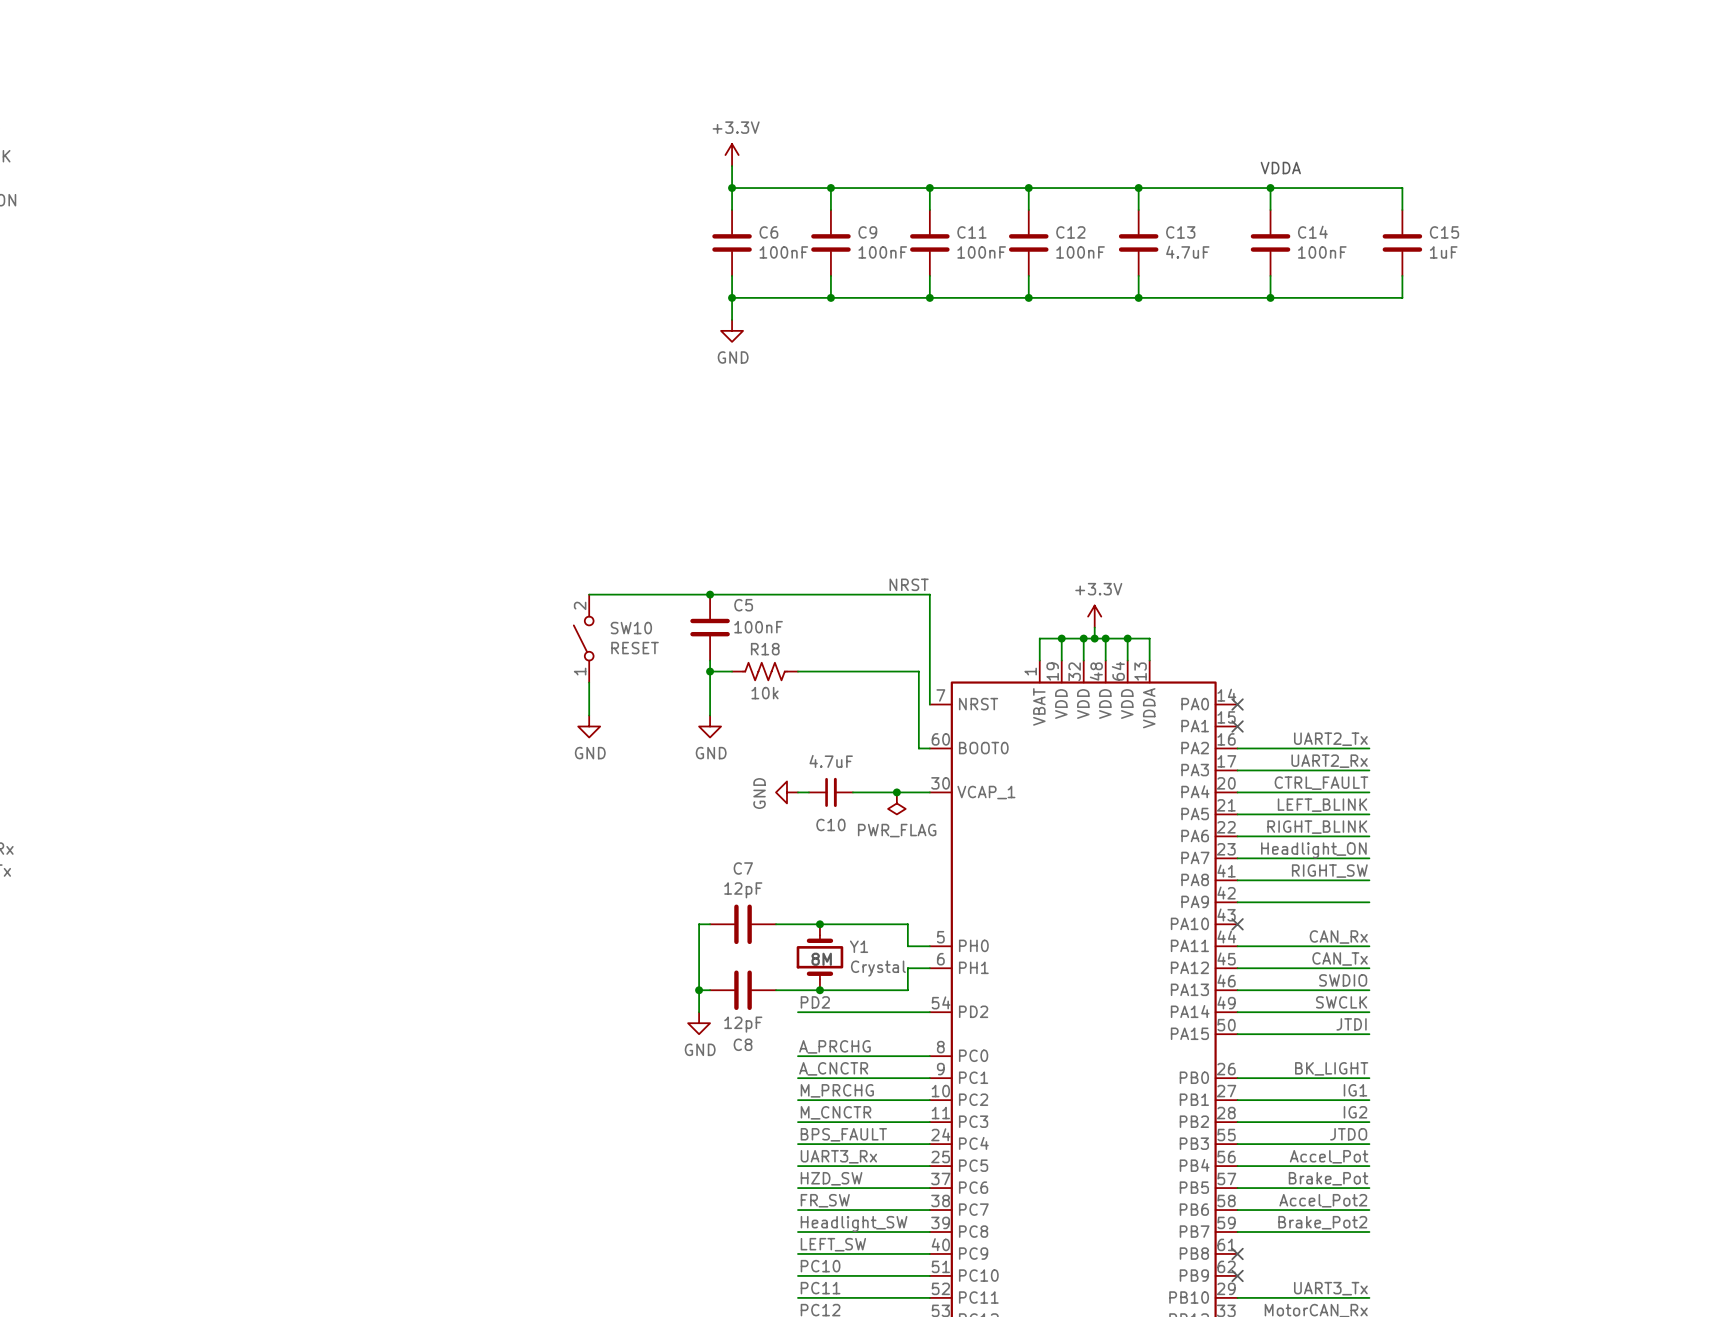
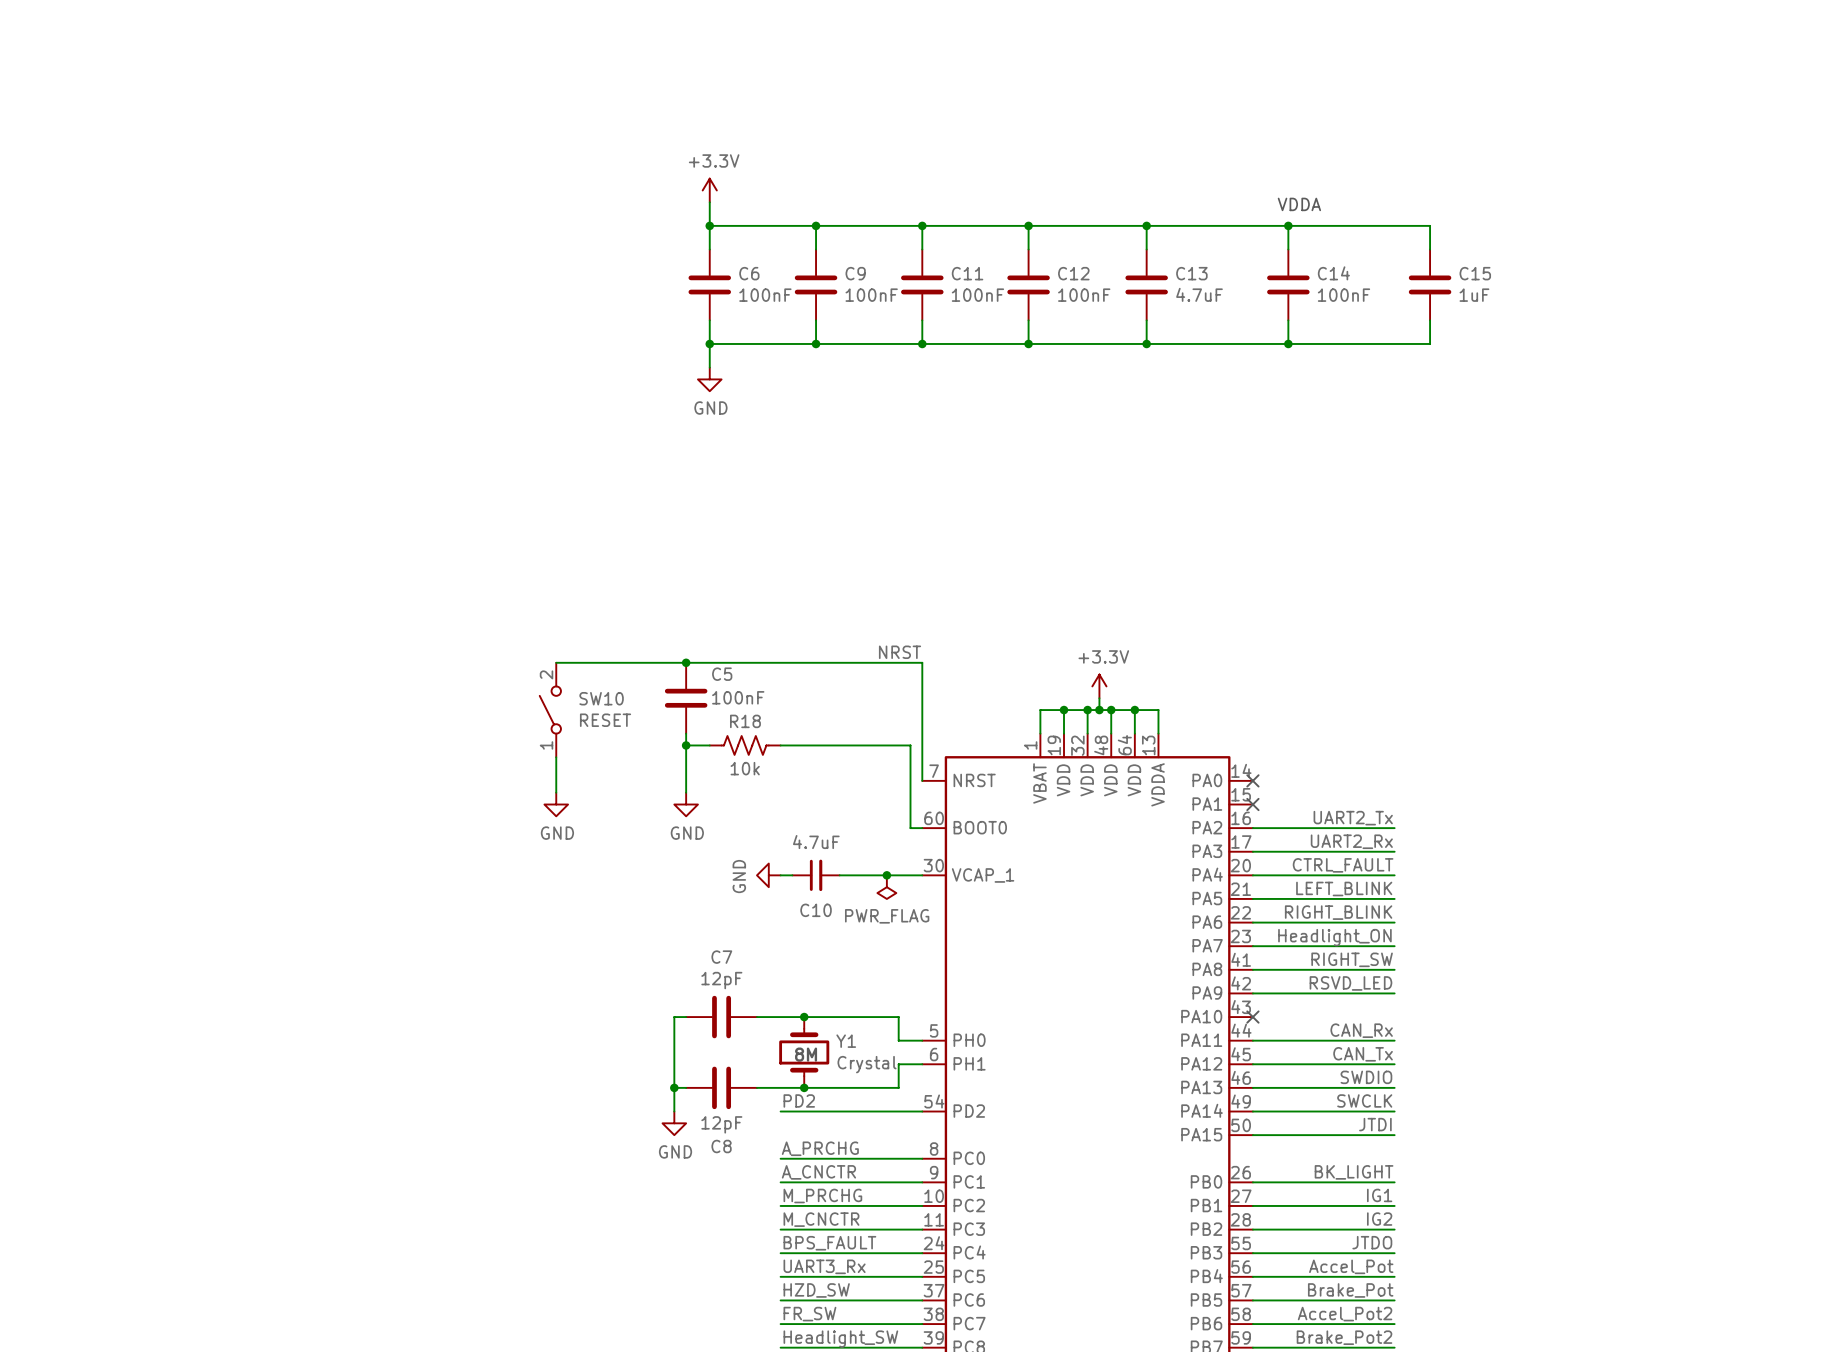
label: none -> RSVD_LED (1350, 983)

